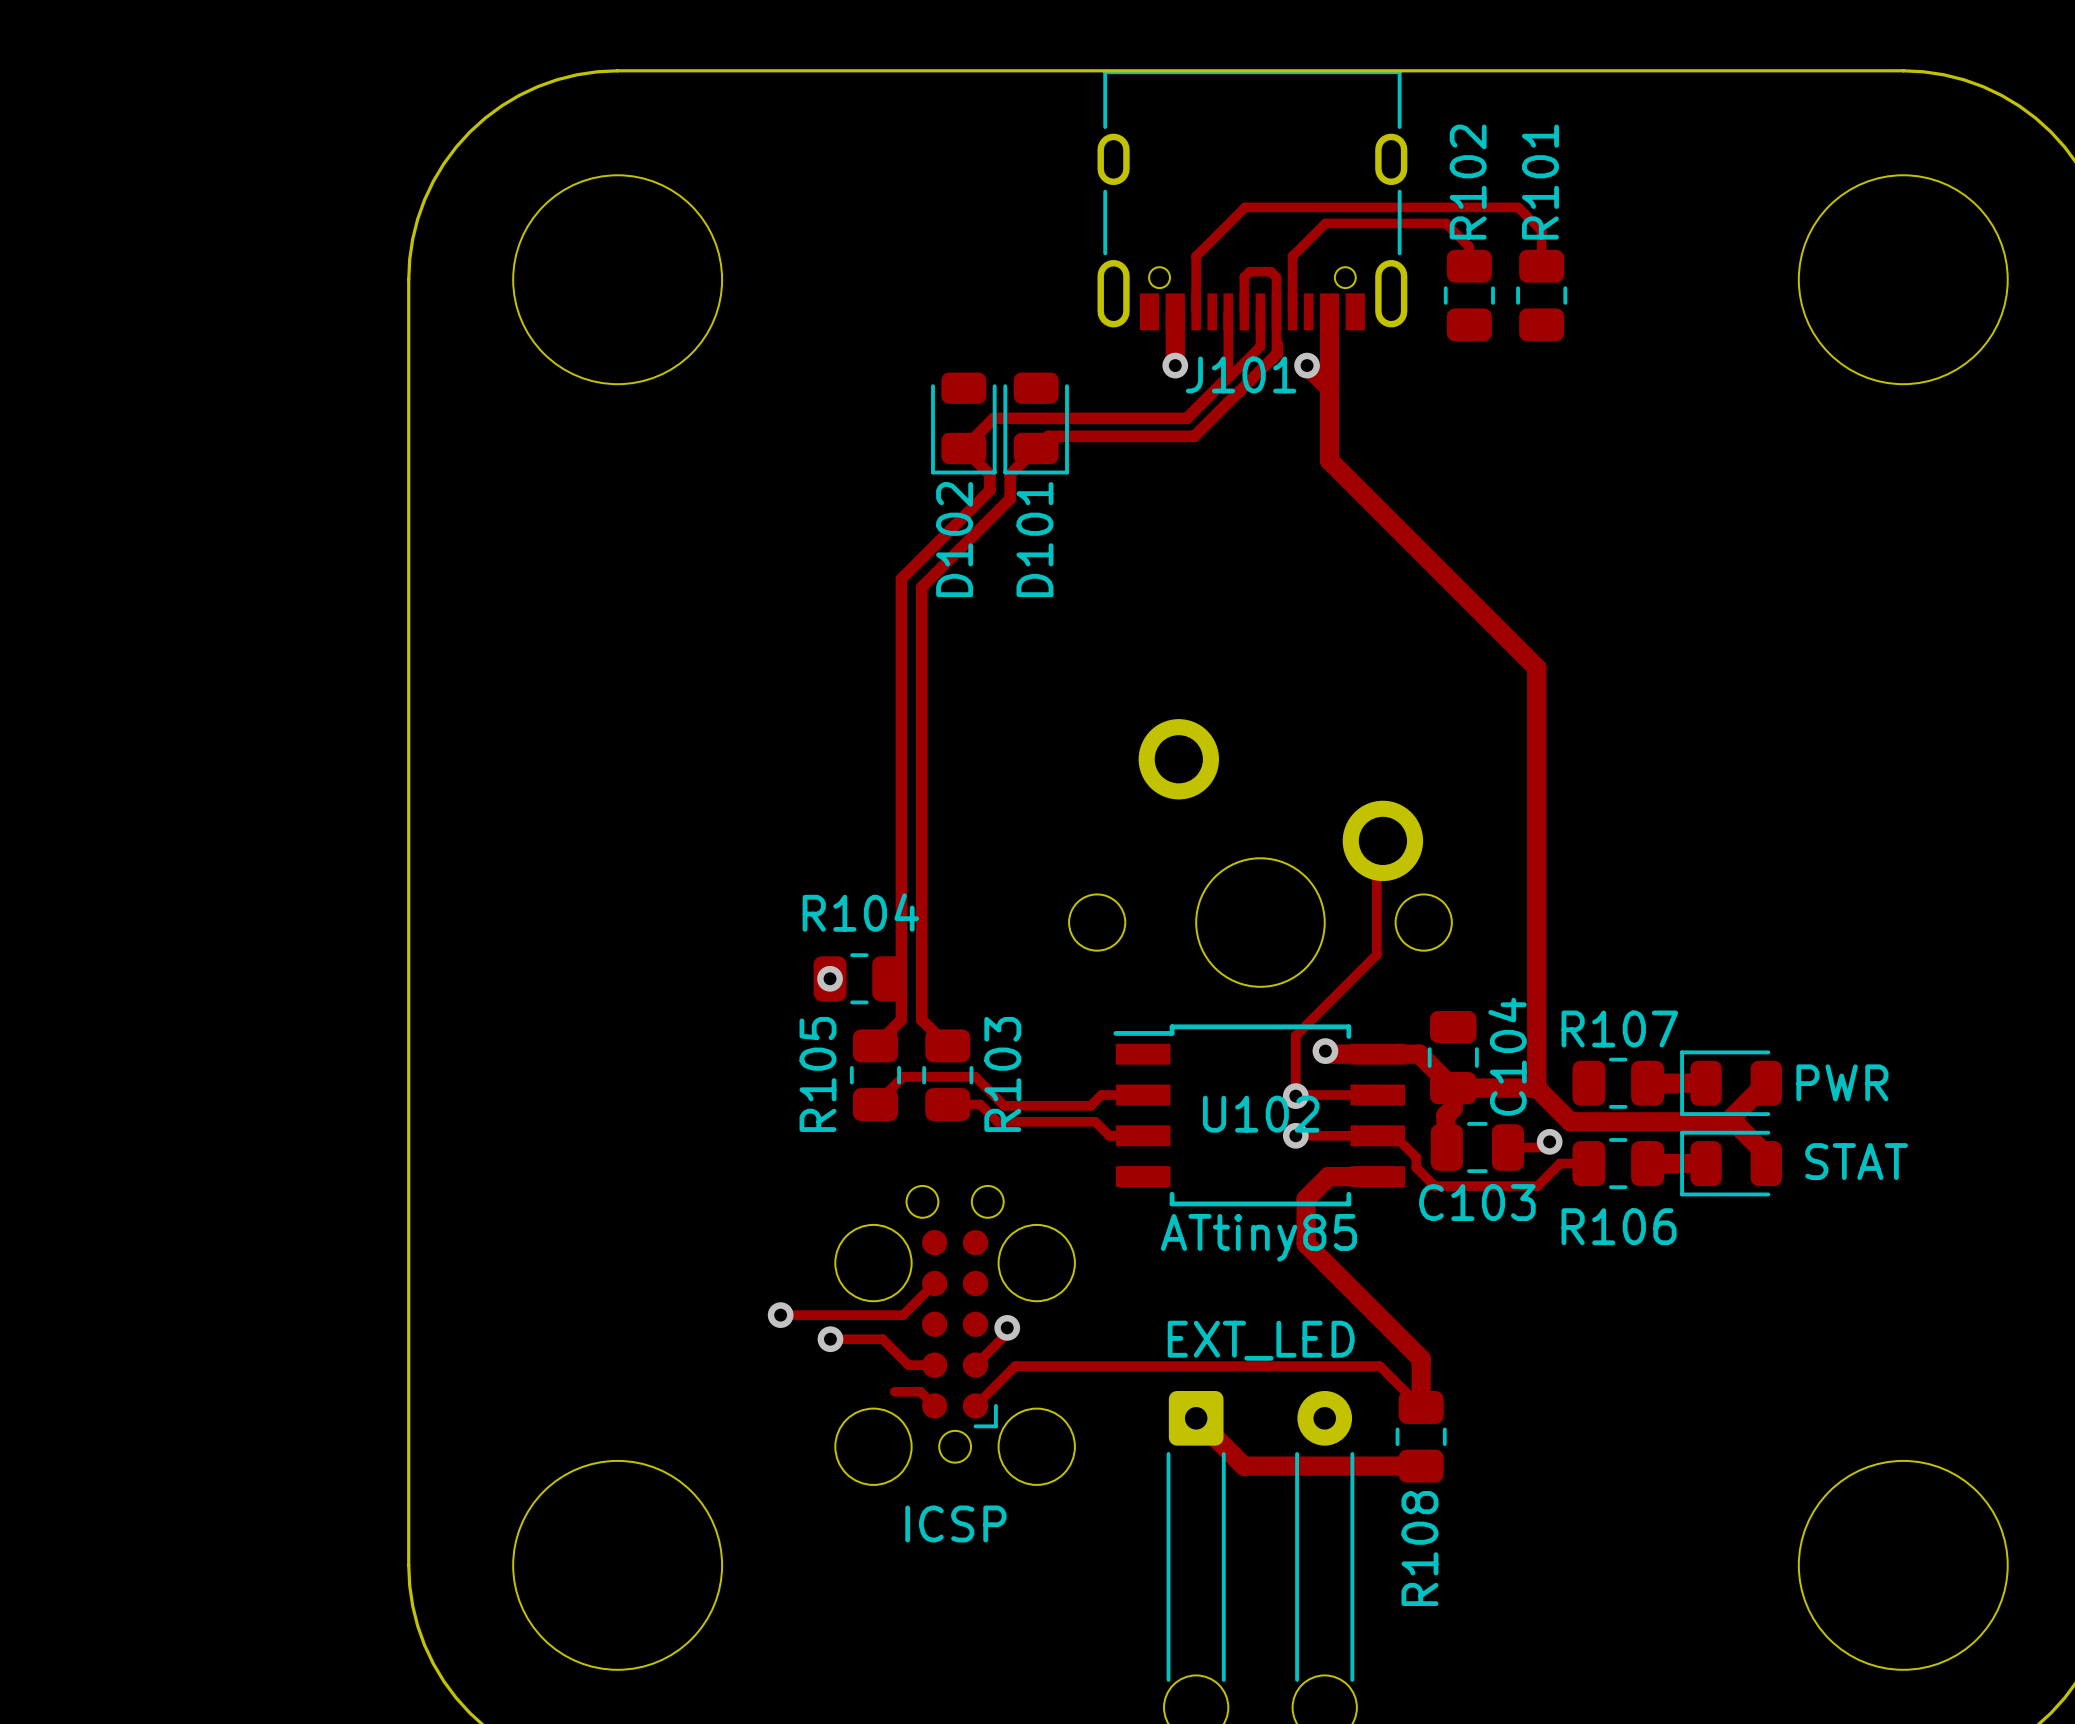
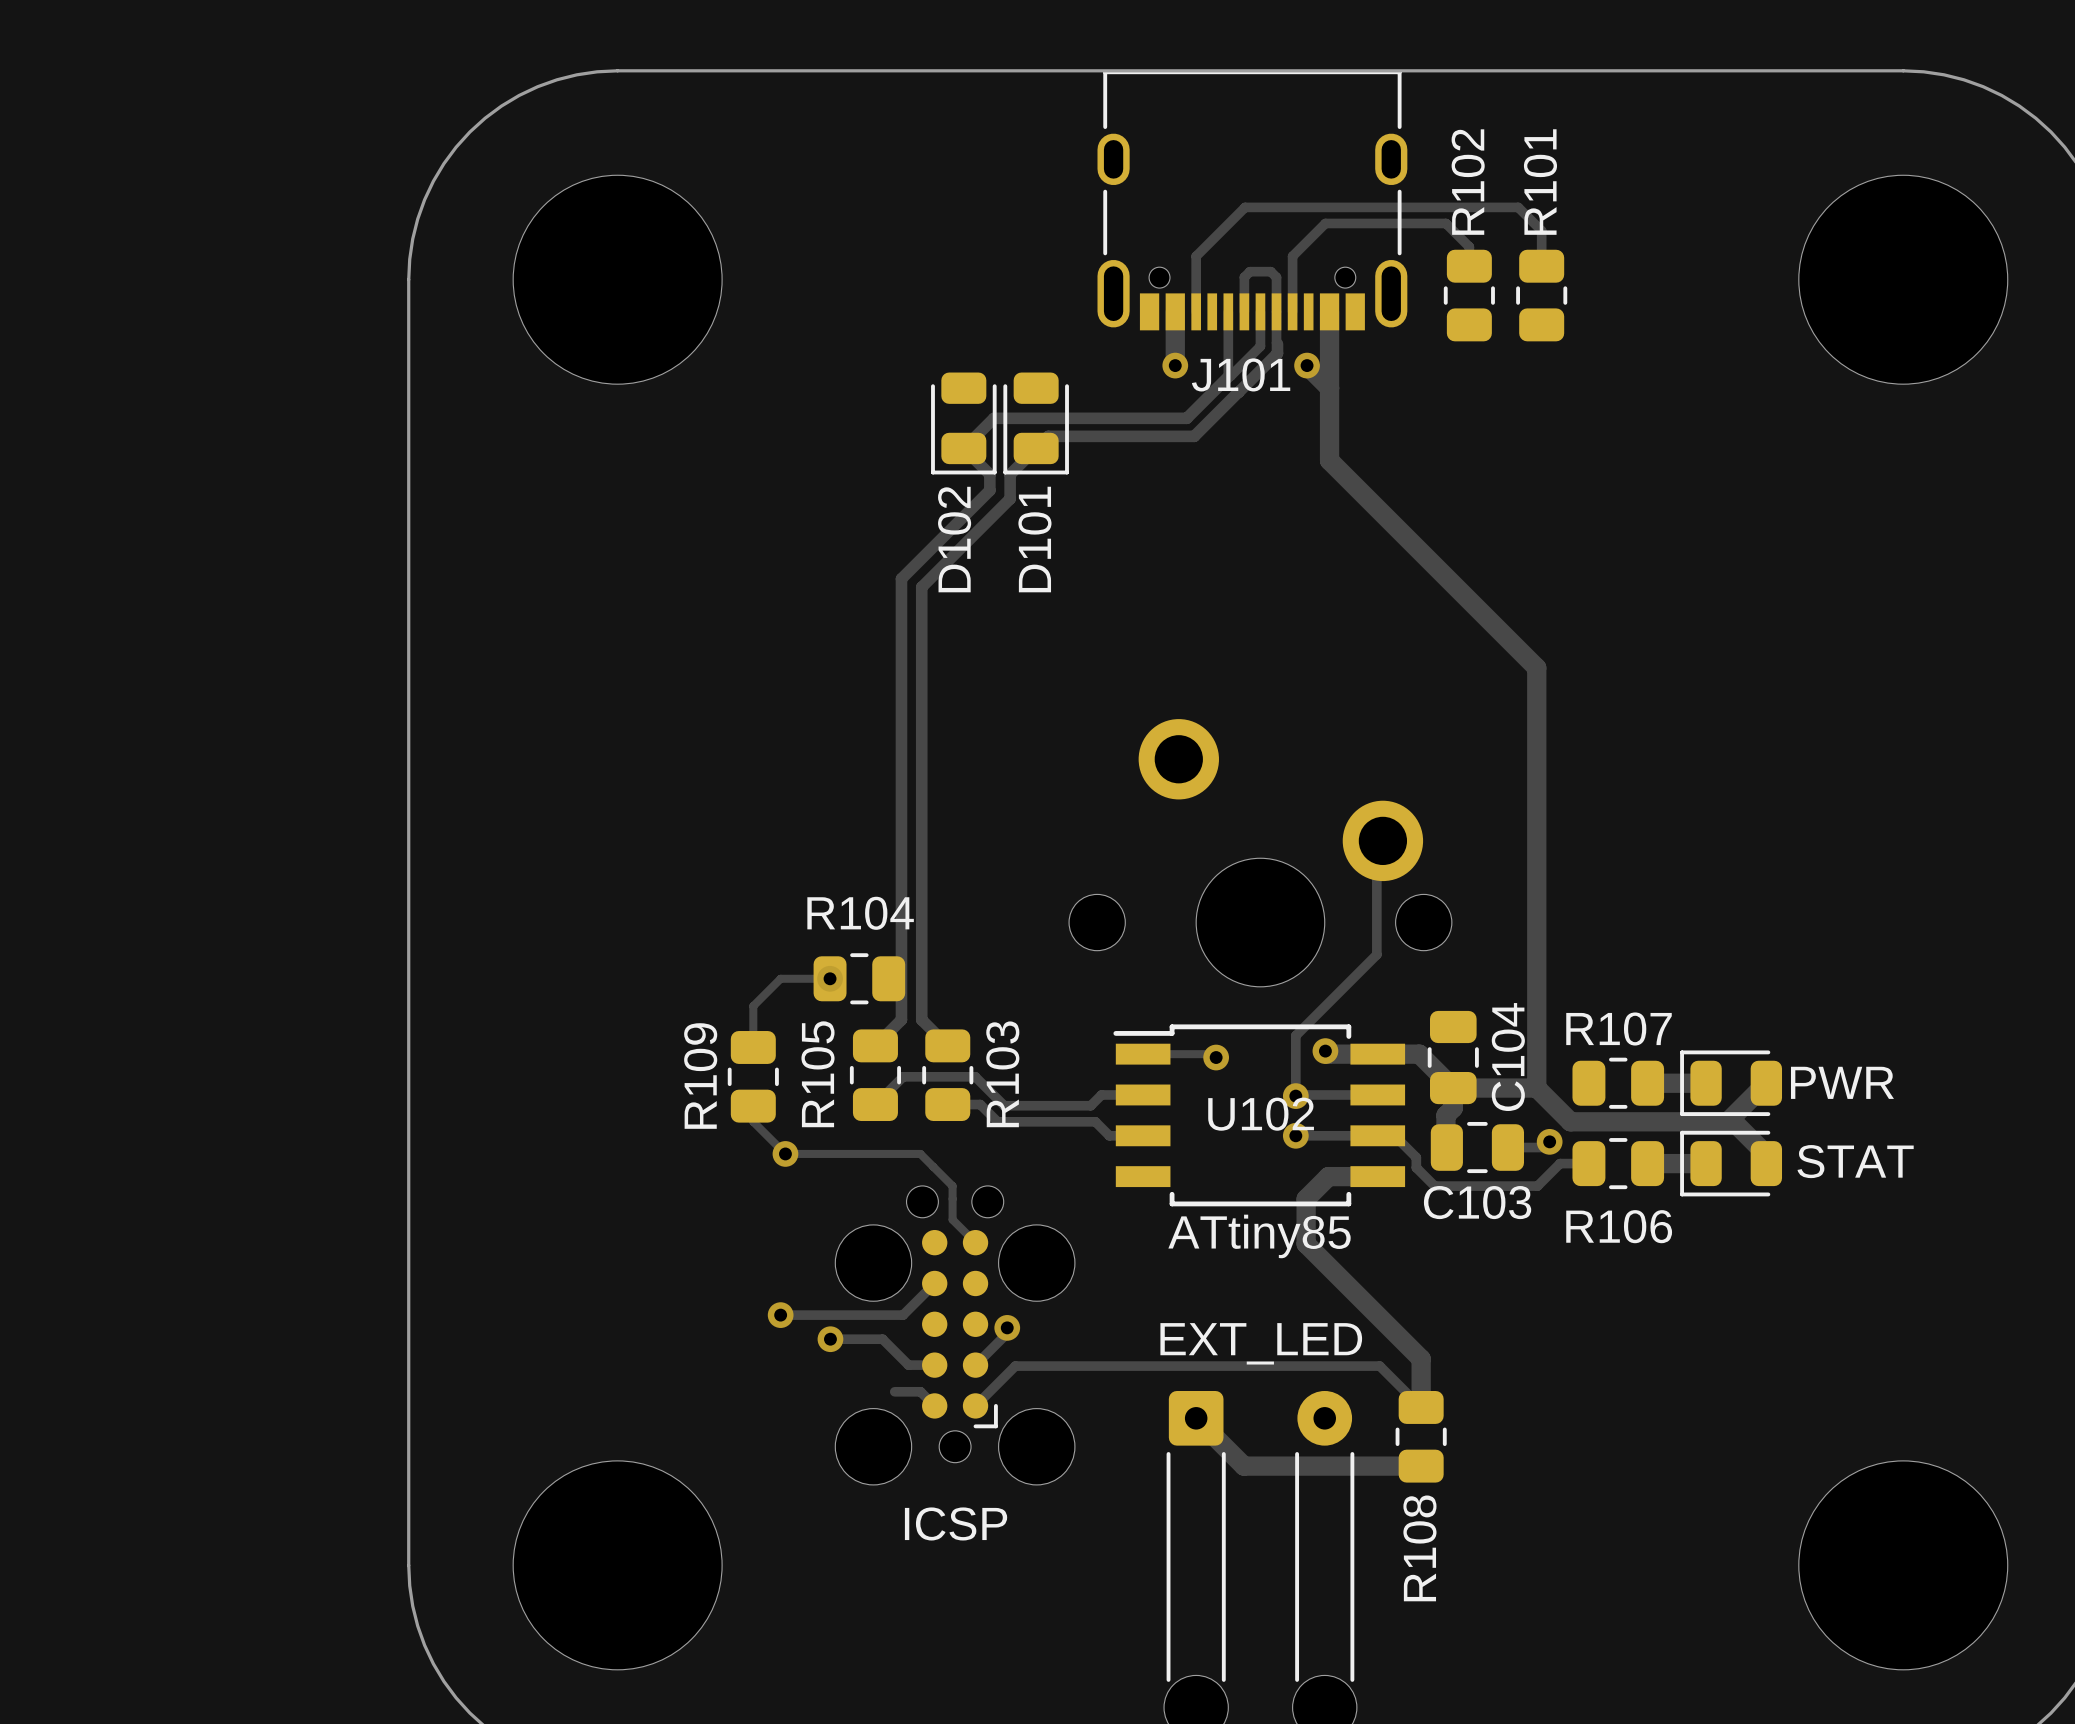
track: none -> (830, 978) (780, 978) (753, 1006) (753, 1047)
track: none -> (1143, 1054) (1212, 1054) (1216, 1057)
via: none -> (1216, 1057)
R109: none -> (753, 1076)
track: none -> (753, 1106) (753, 1121) (785, 1153) (920, 1153) (952, 1186) (952, 1219) (975, 1242)
via: none -> (785, 1153)

